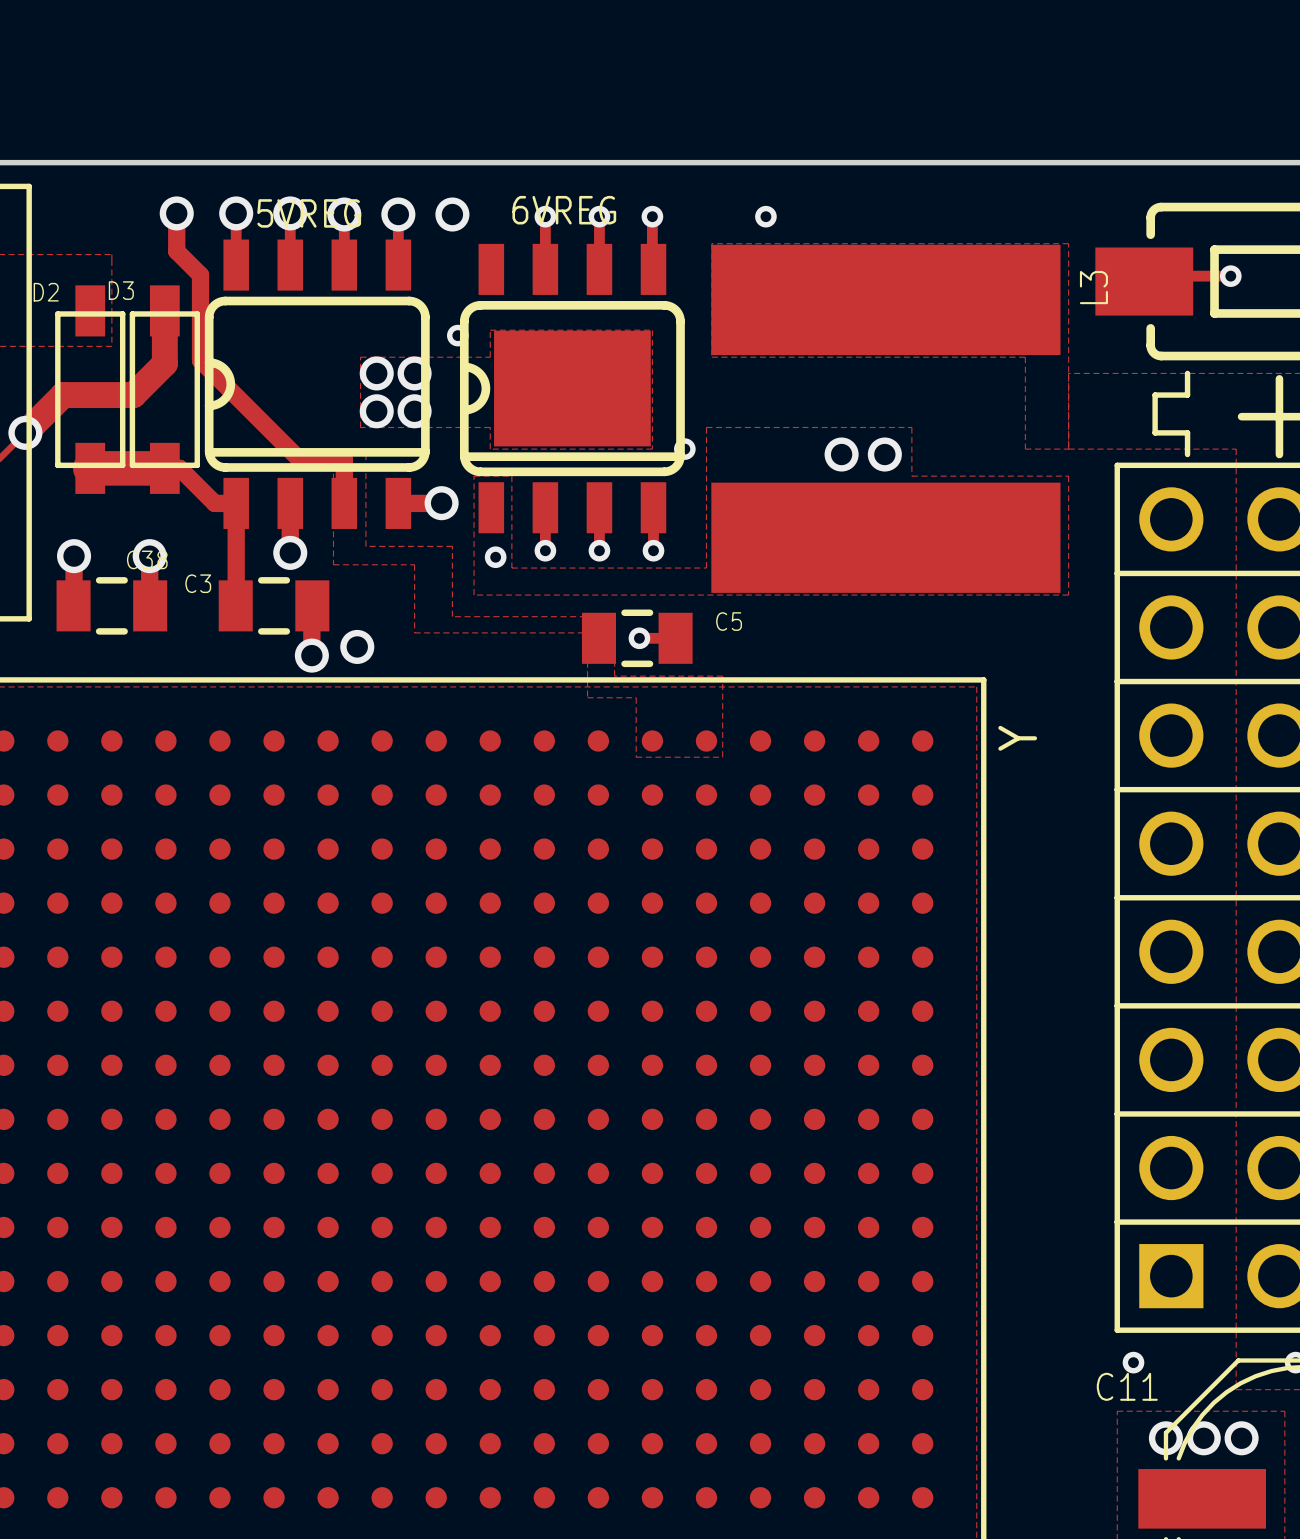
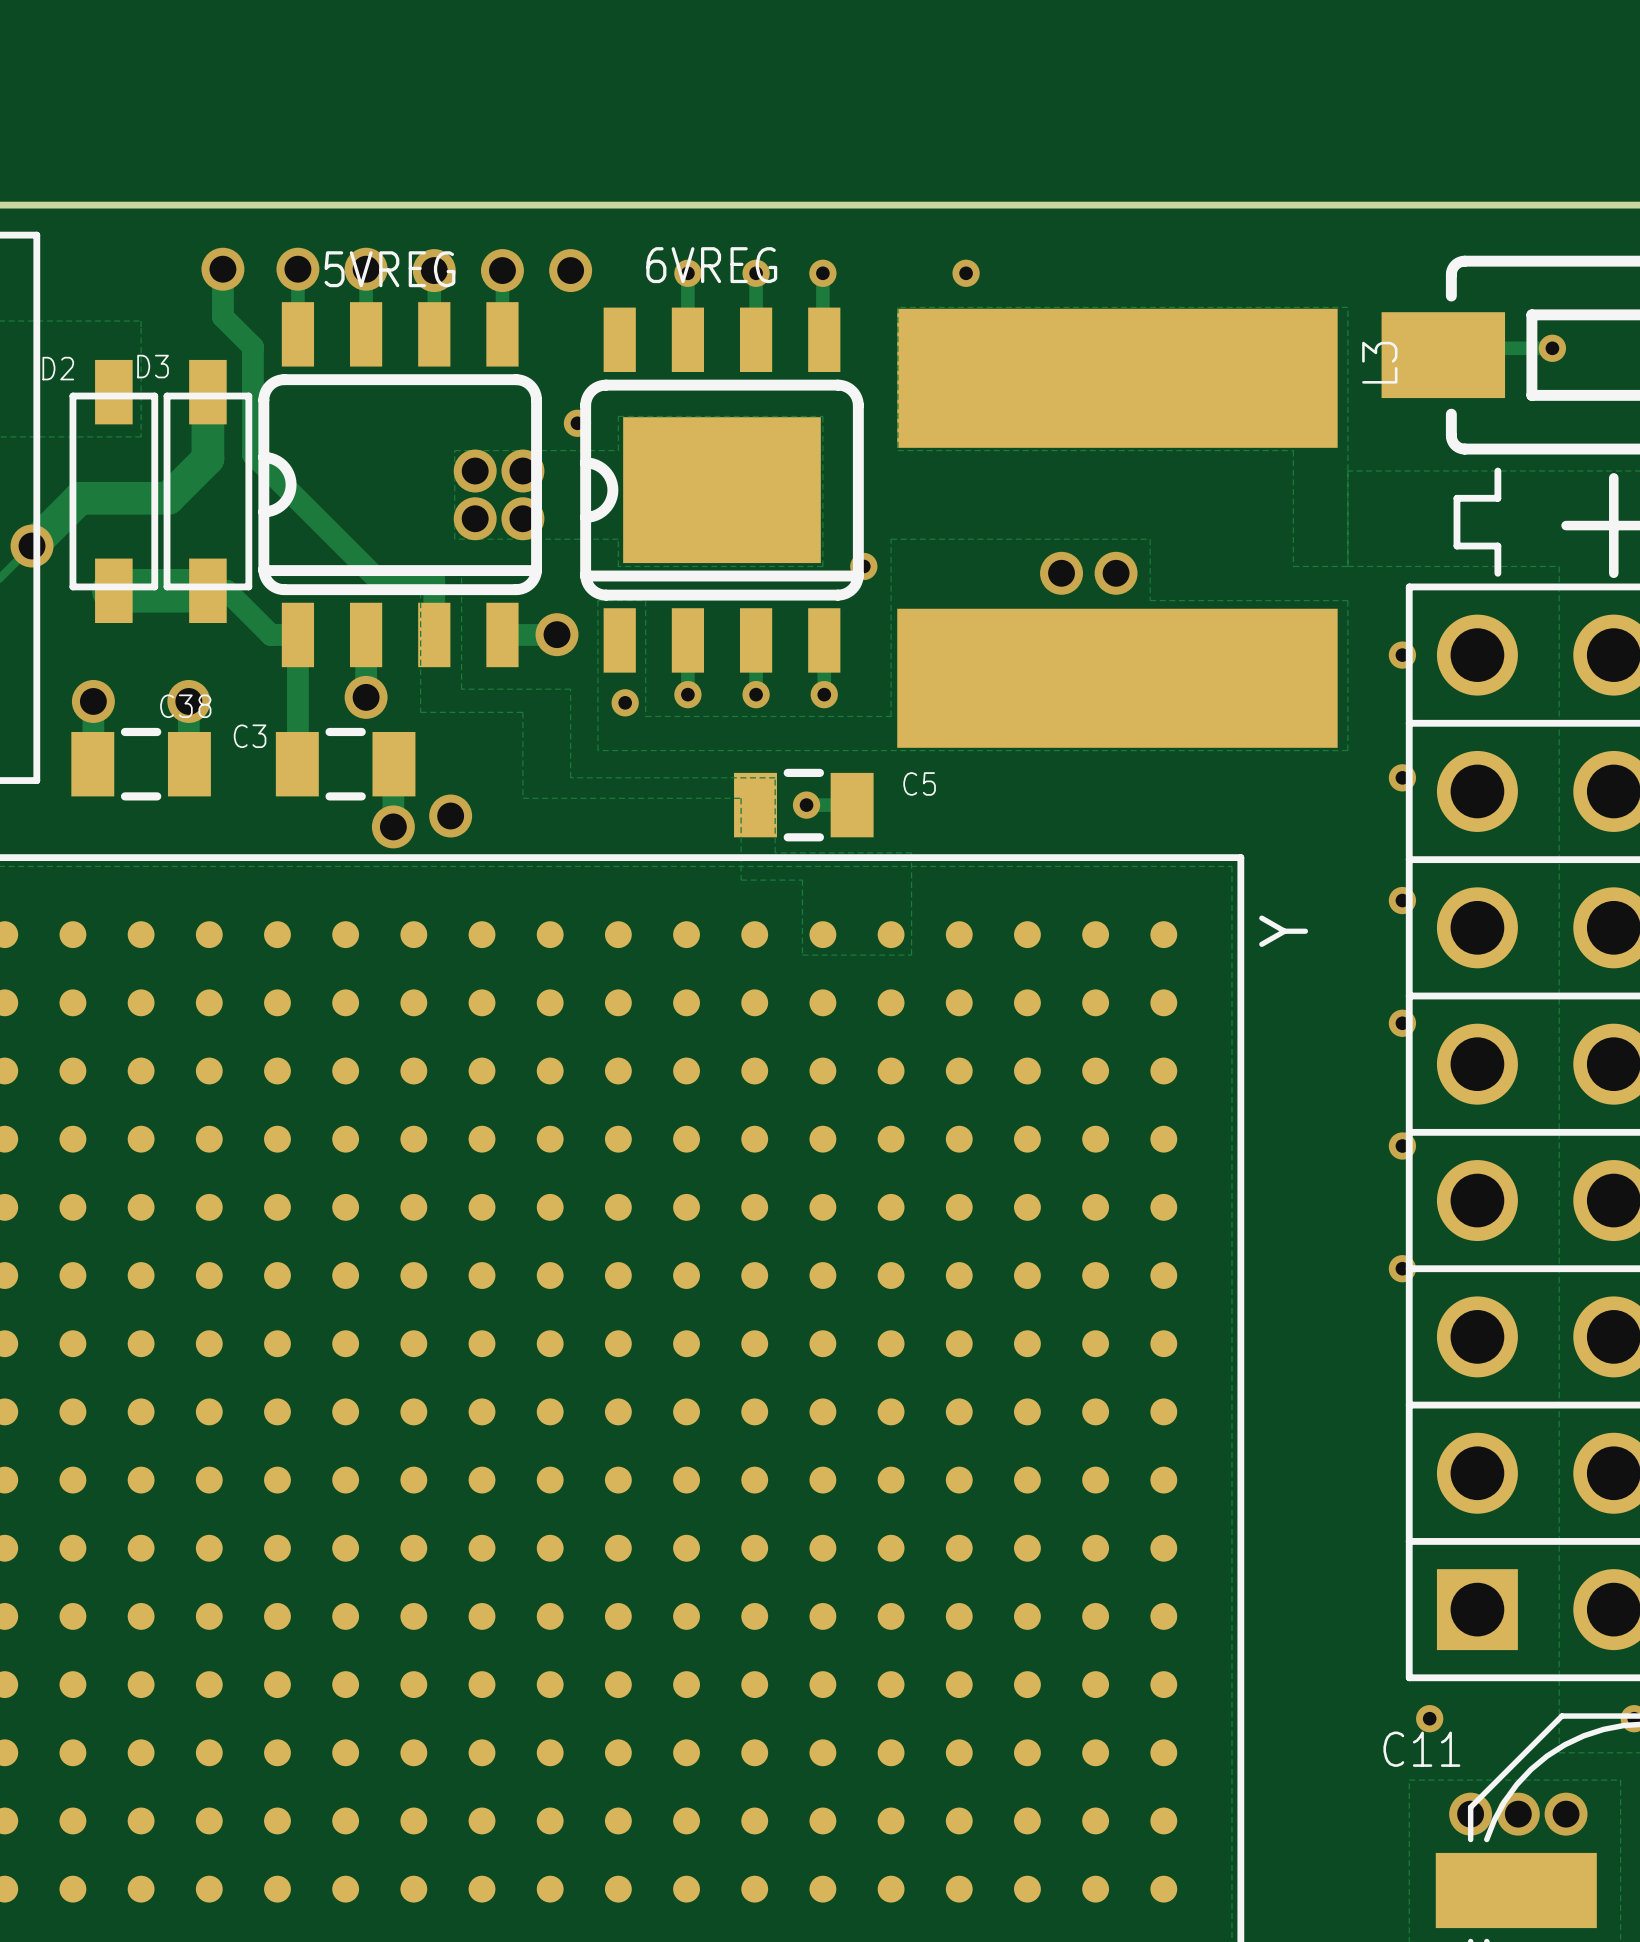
via: none -> (1402, 655)
via: none -> (1402, 777)
via: none -> (1402, 900)
via: none -> (1402, 1023)
via: none -> (1402, 1145)
via: none -> (1402, 1268)

